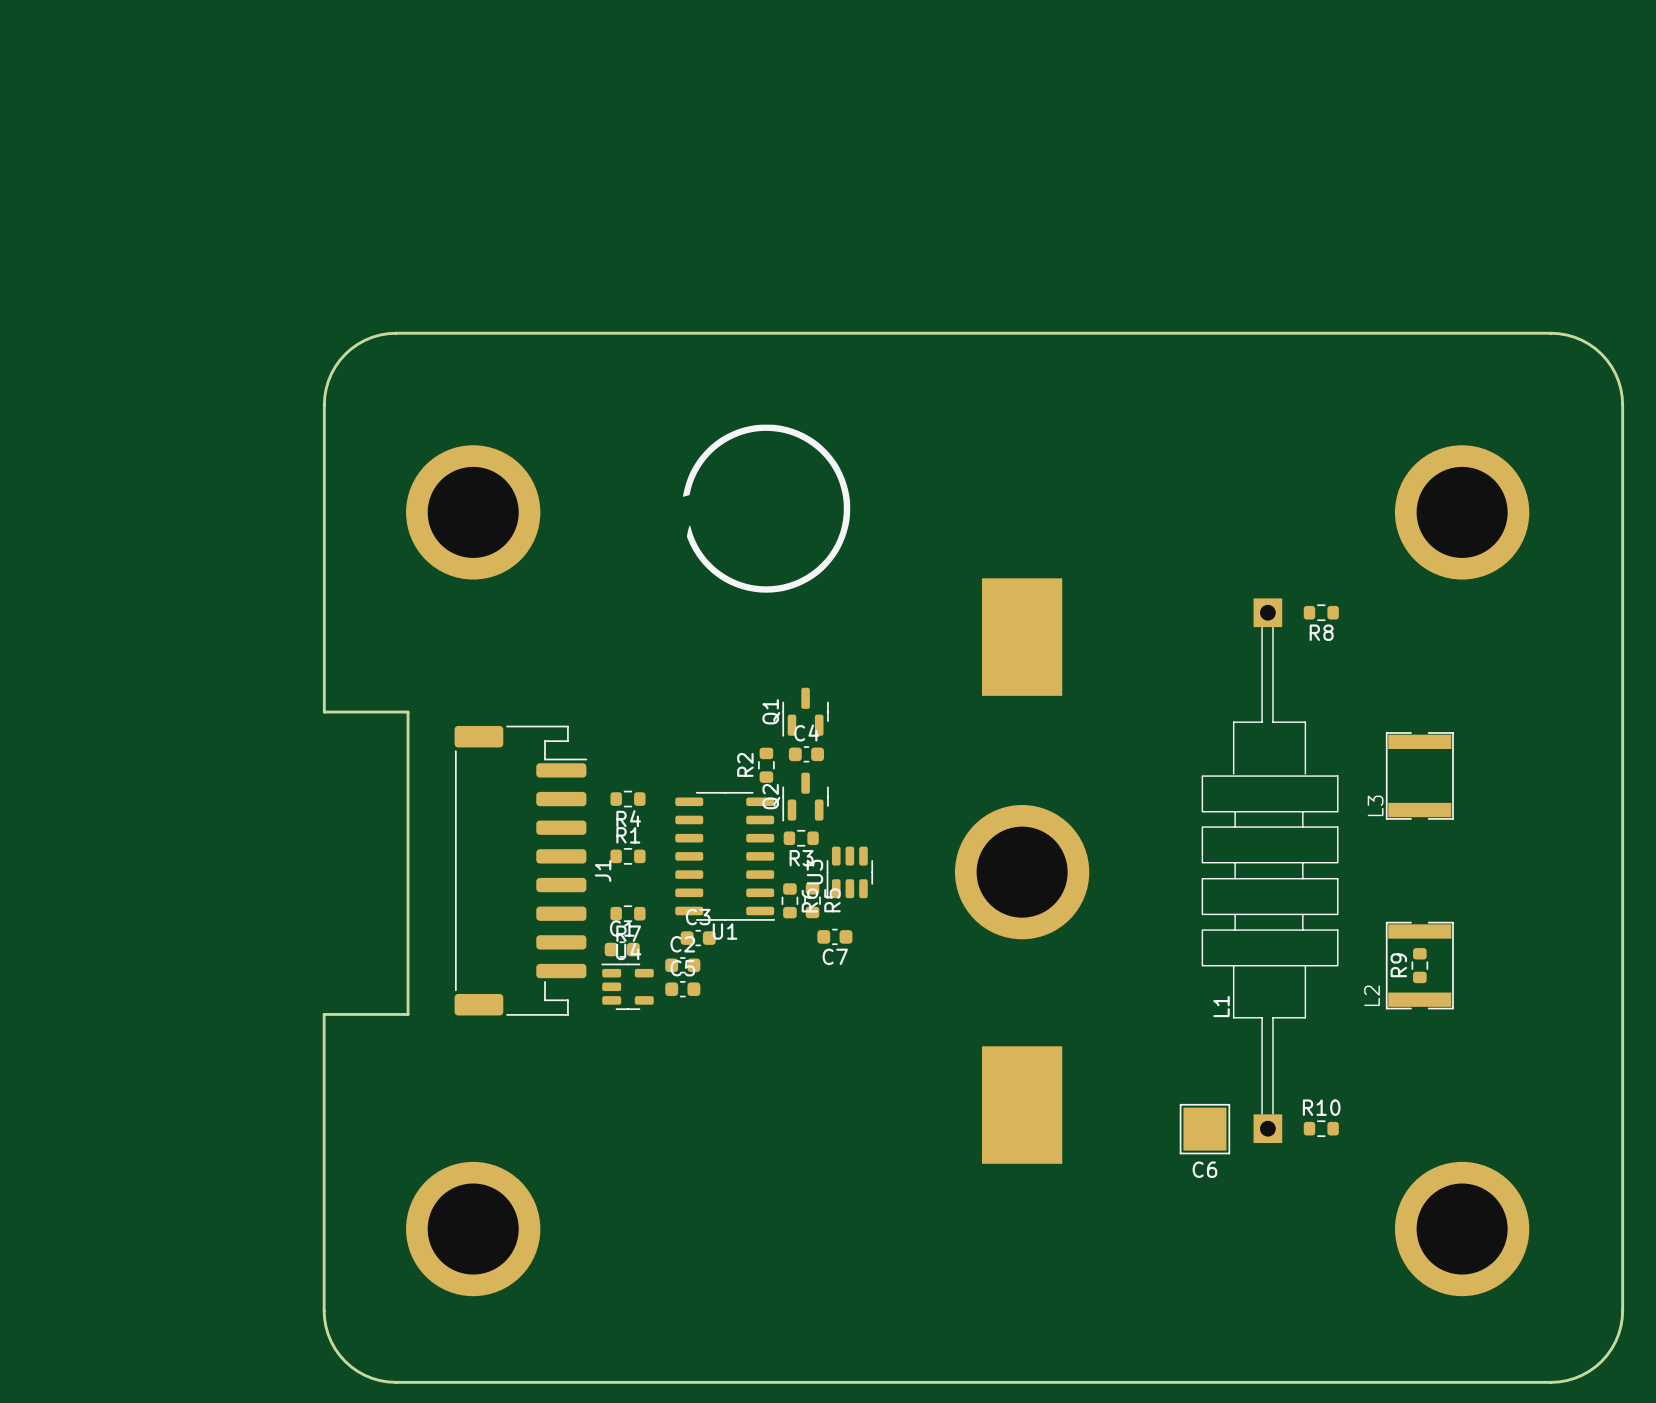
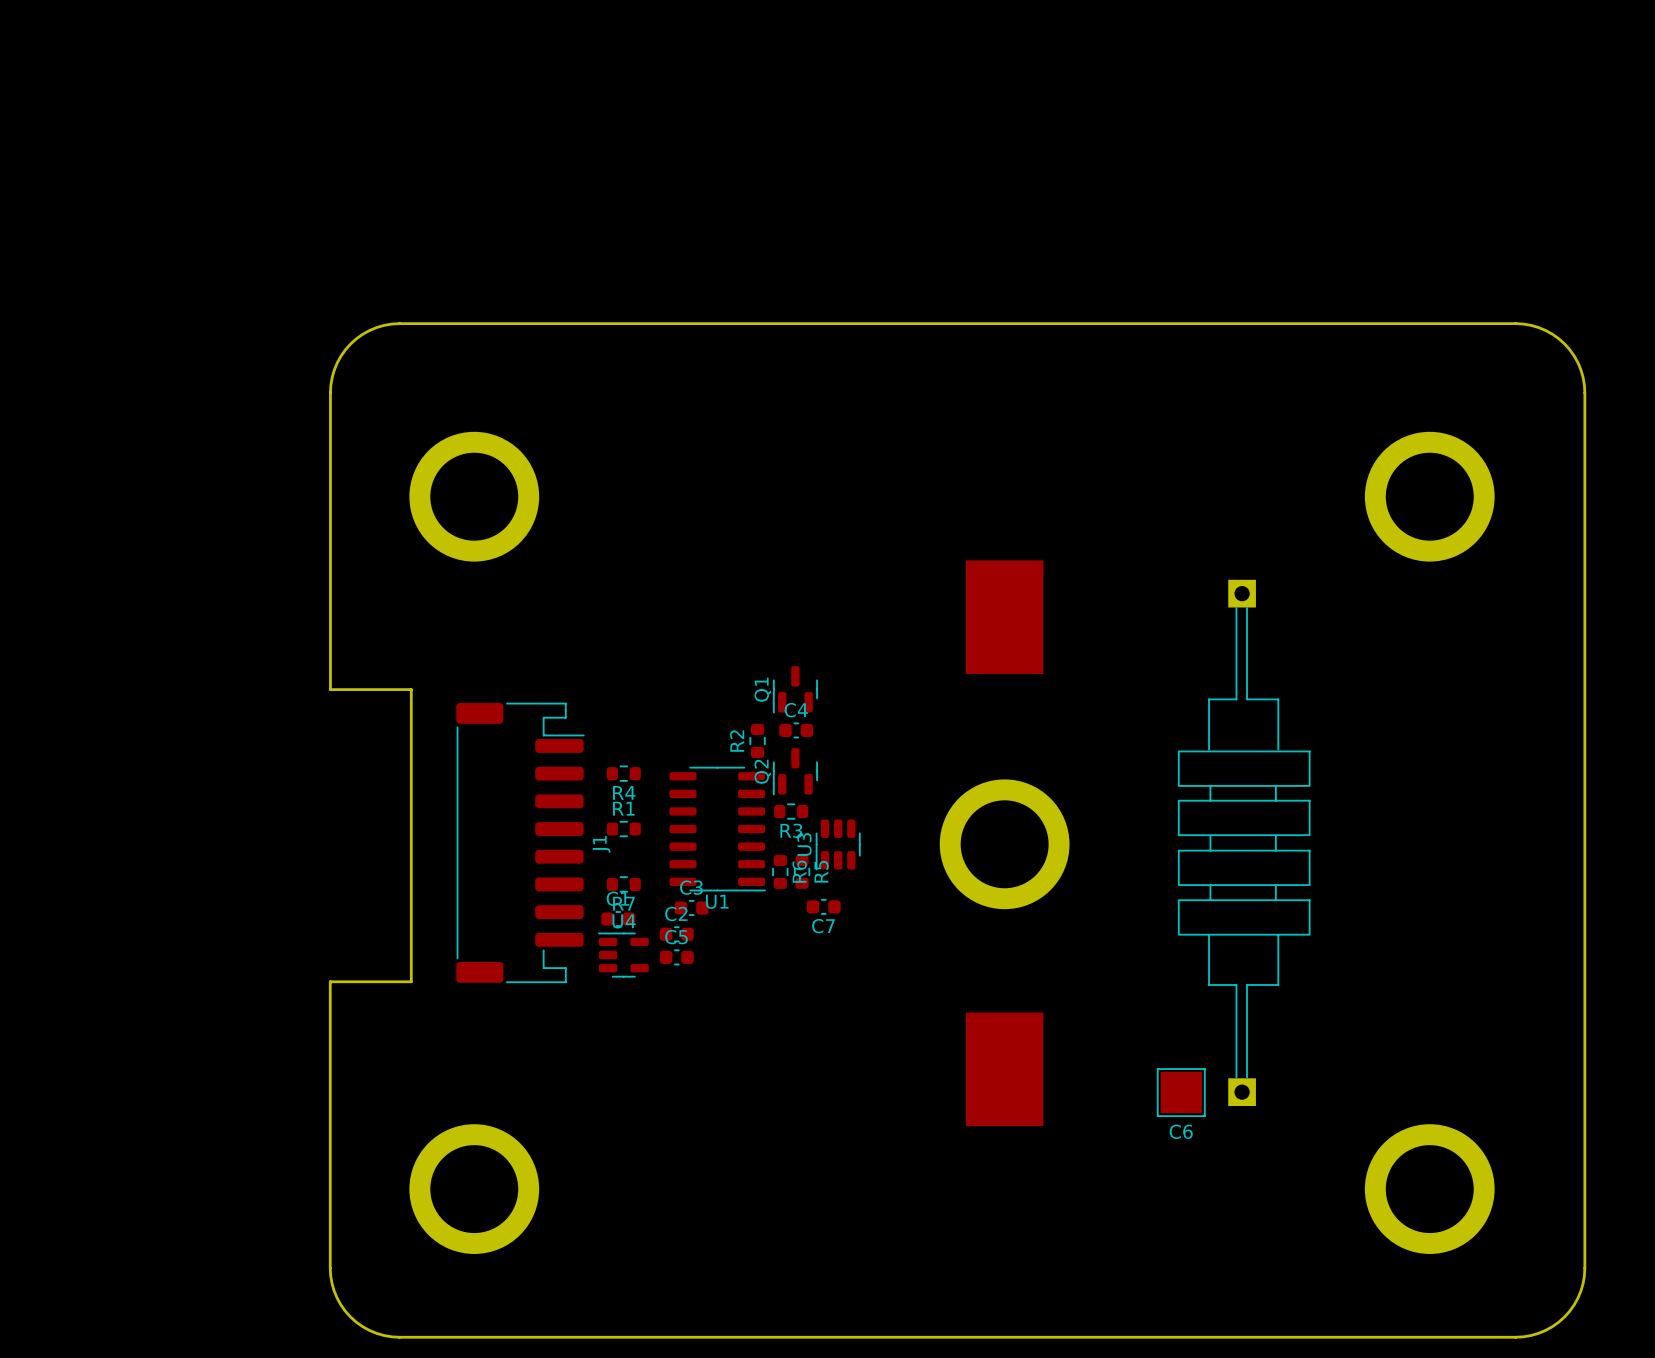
drawing: [683, 424, 851, 593] -> none
R8: (1321, 612) -> none
L3: (1419, 775) -> none
R9: (1419, 965) -> none
L2: (1419, 965) -> none
L1 name: L1 (1221, 1006) -> none
R10: (1321, 1128) -> none

